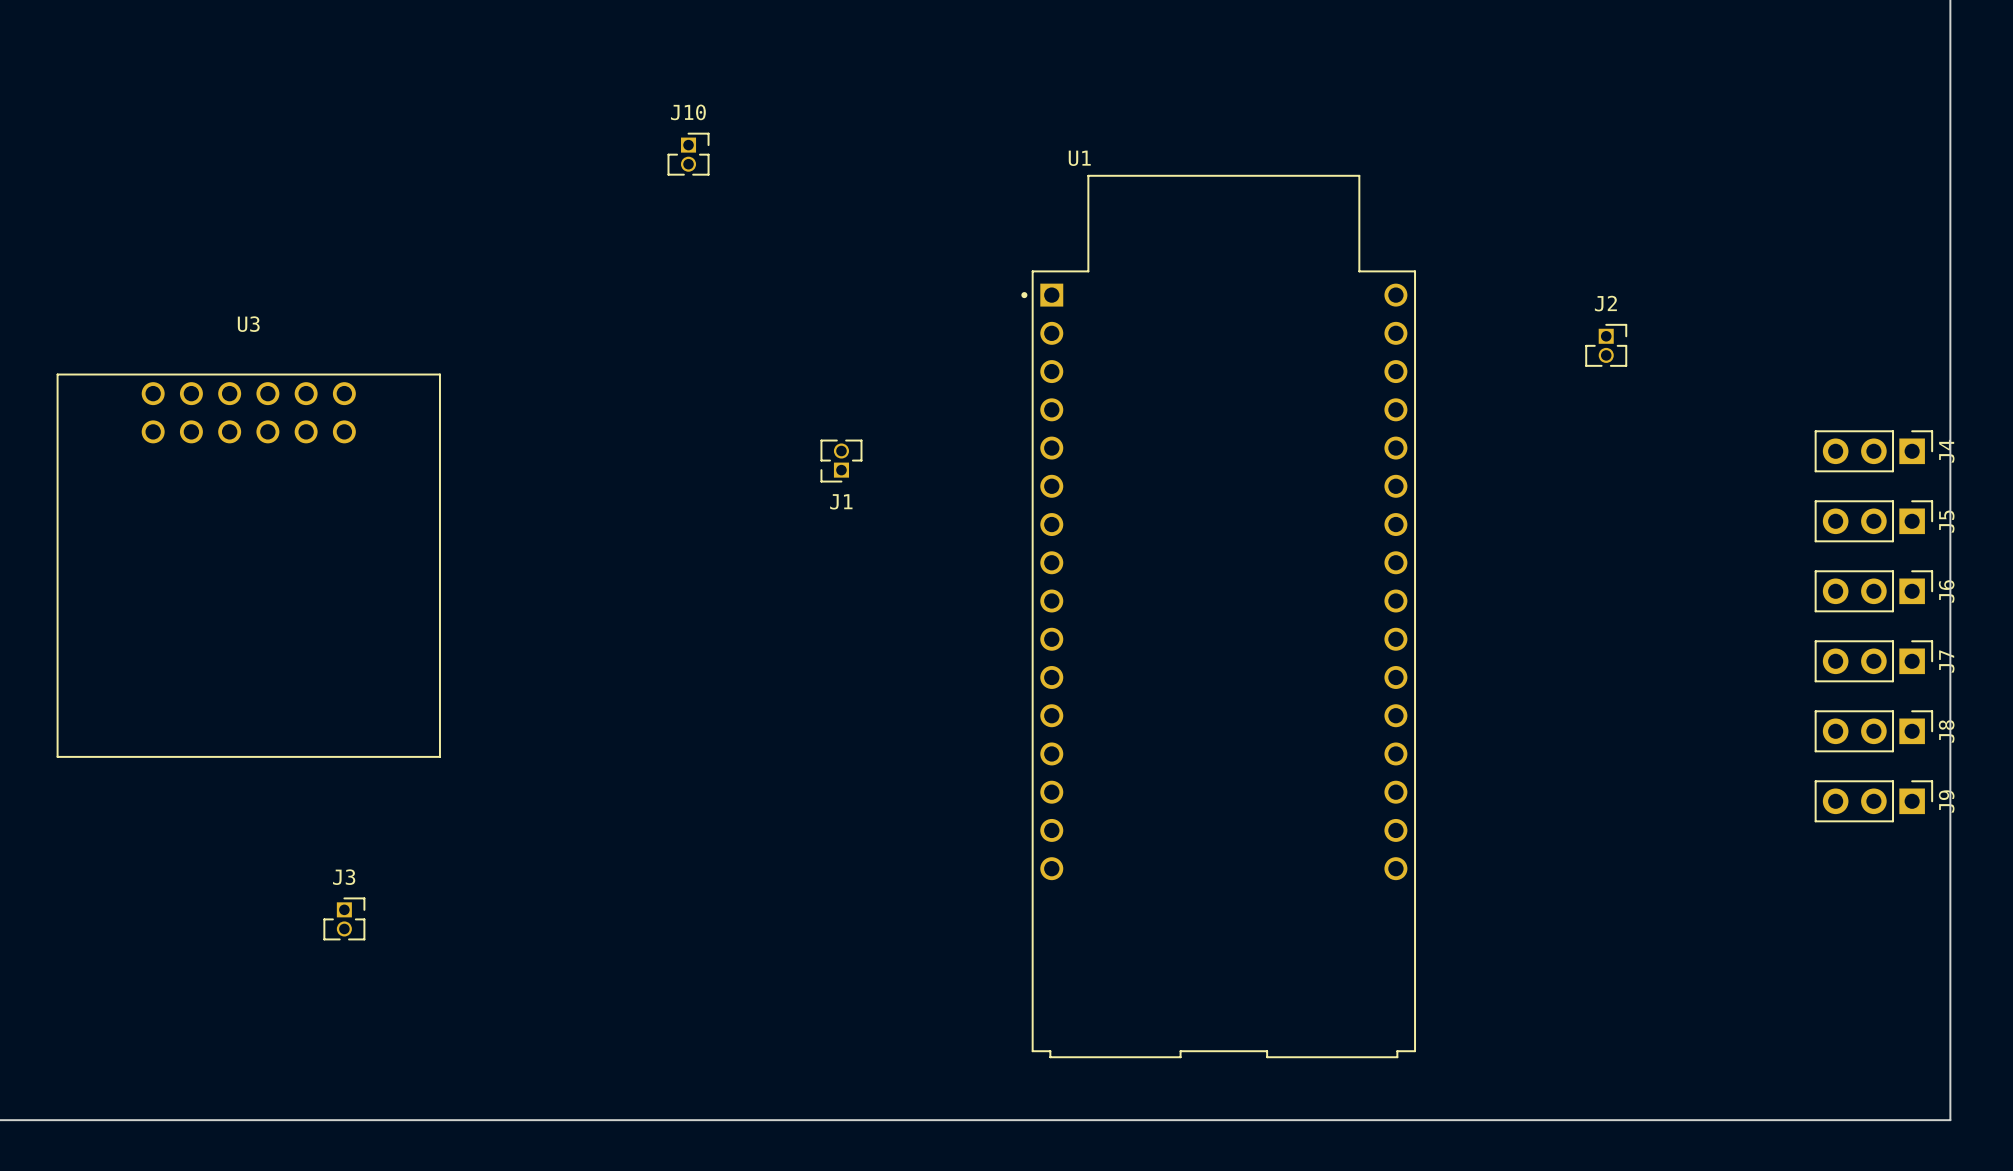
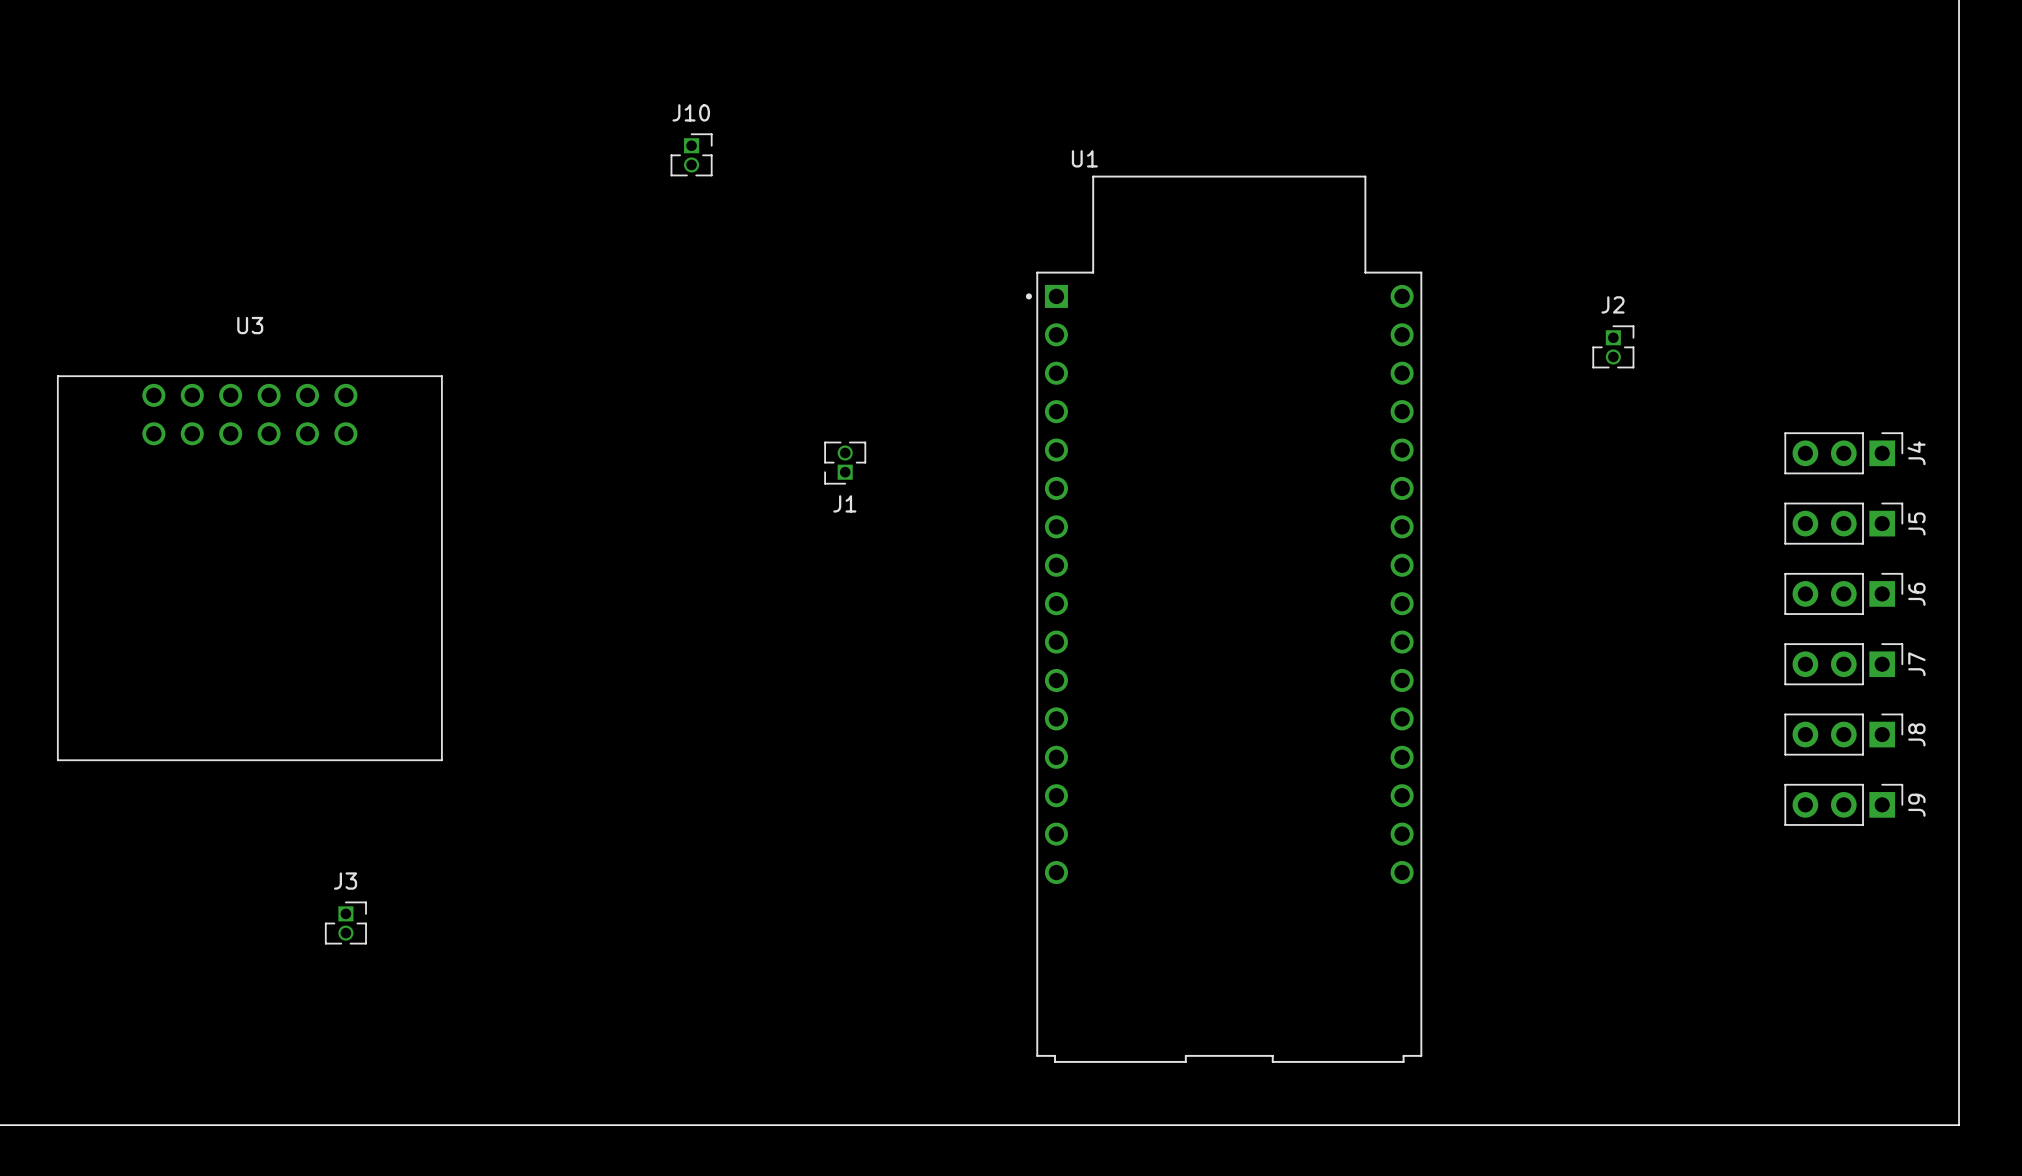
J4 position: (1873, 451) -> (1843, 453)
J5 position: (1873, 521) -> (1843, 523)
J6 position: (1873, 591) -> (1843, 593)
J7 position: (1873, 661) -> (1843, 664)
J8 position: (1873, 731) -> (1843, 734)
J9 position: (1873, 801) -> (1843, 804)

